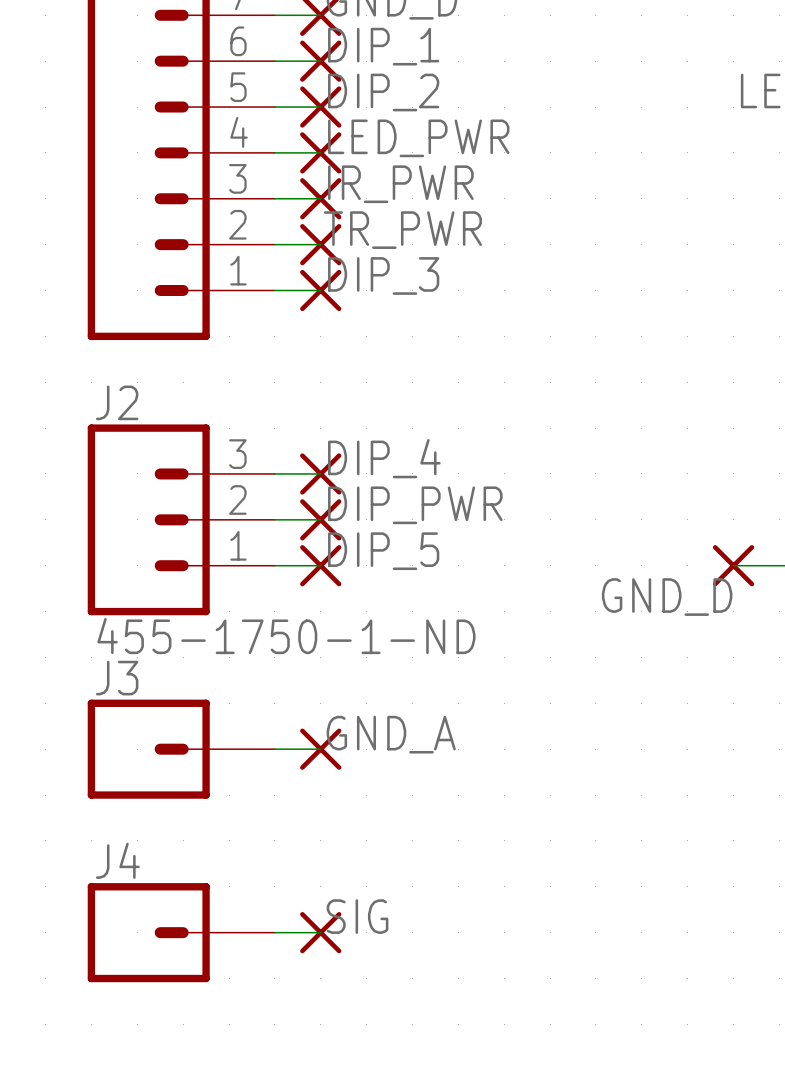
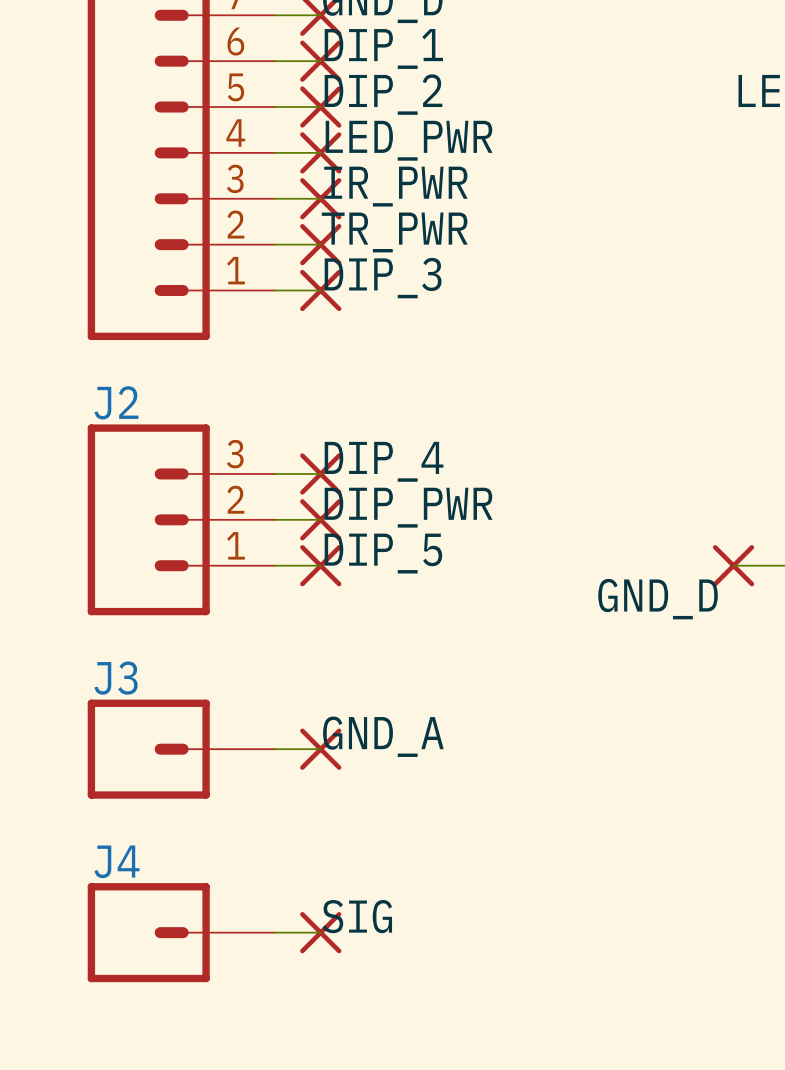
J2 value: 455-1750-1-ND (286, 636) -> none

